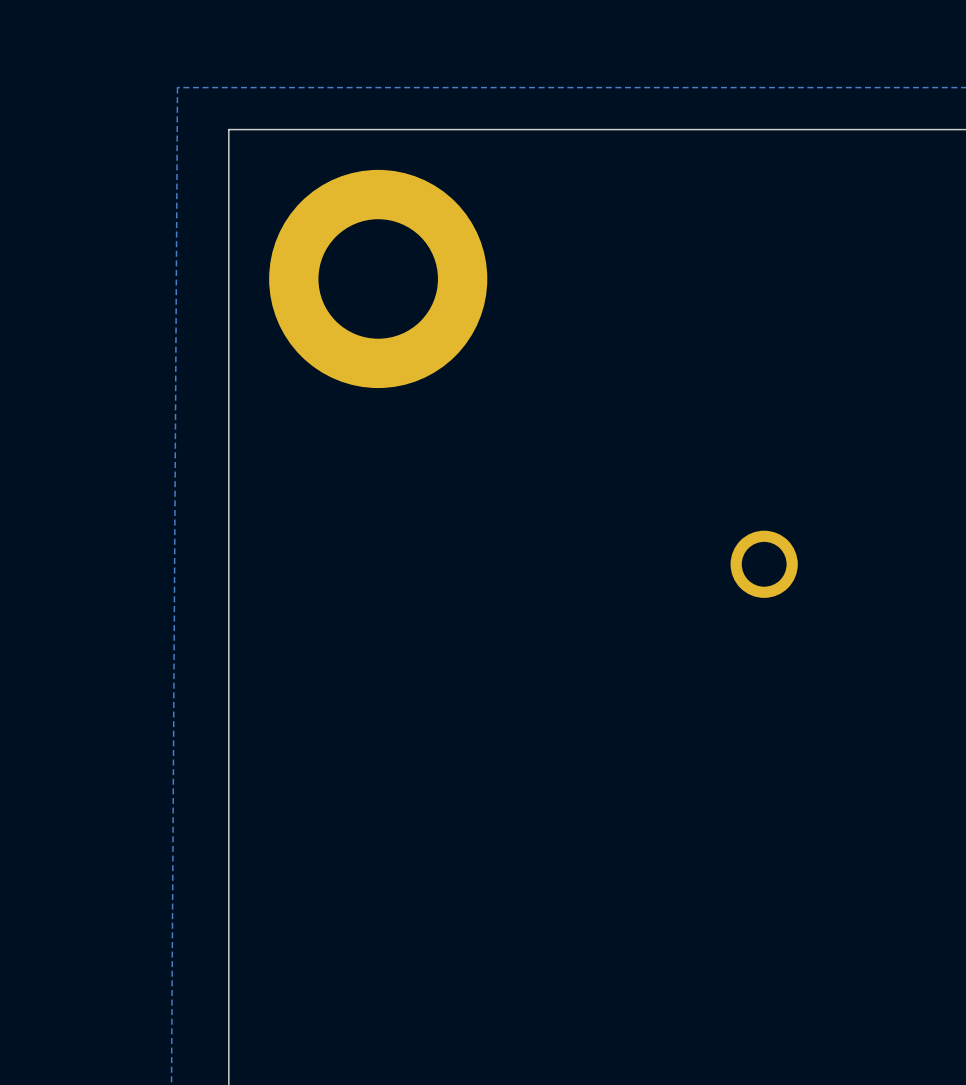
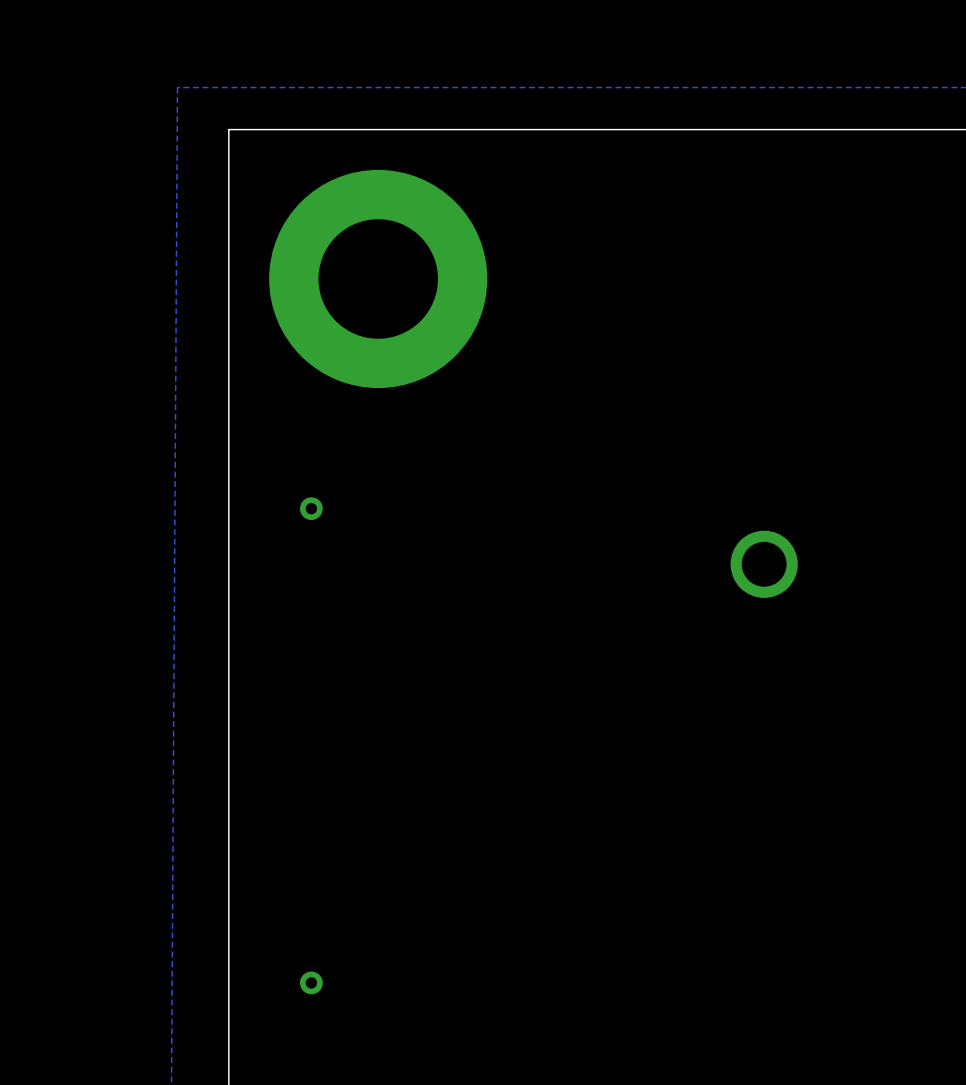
via: none -> (311, 508)
via: none -> (311, 982)

